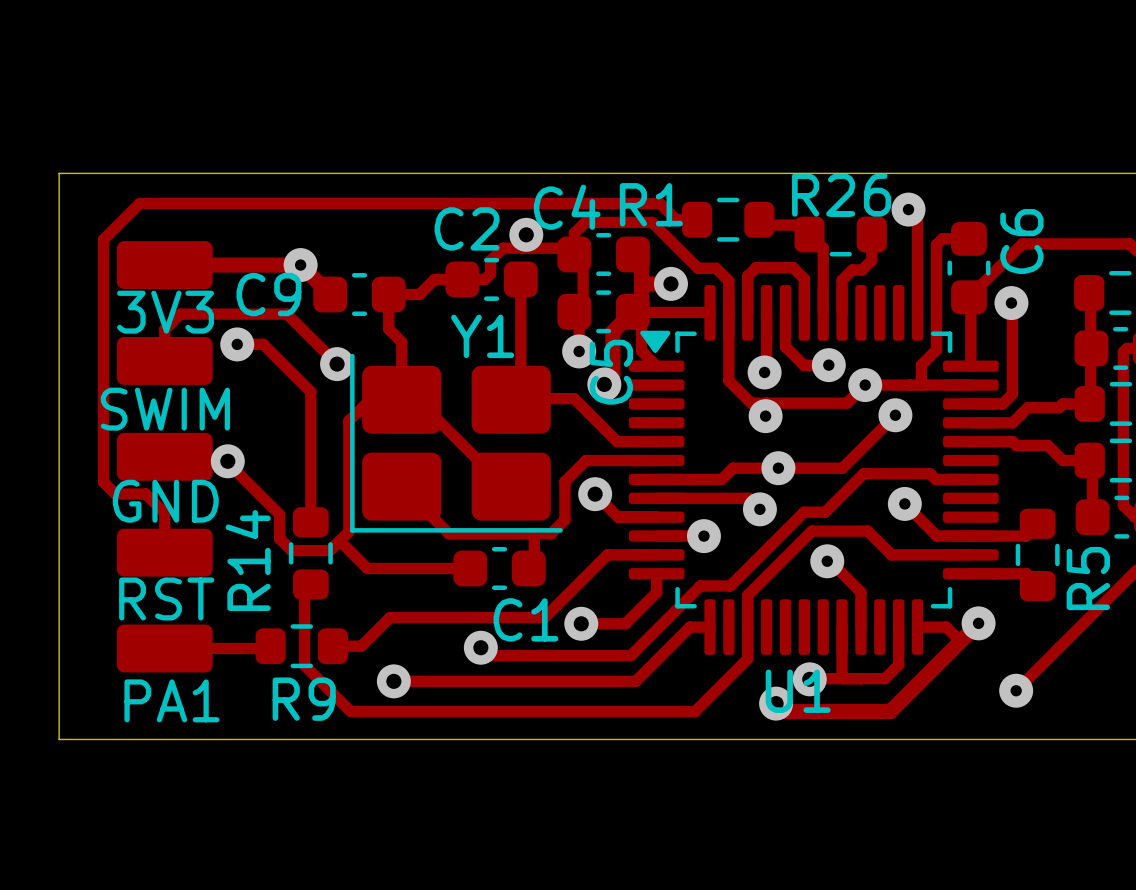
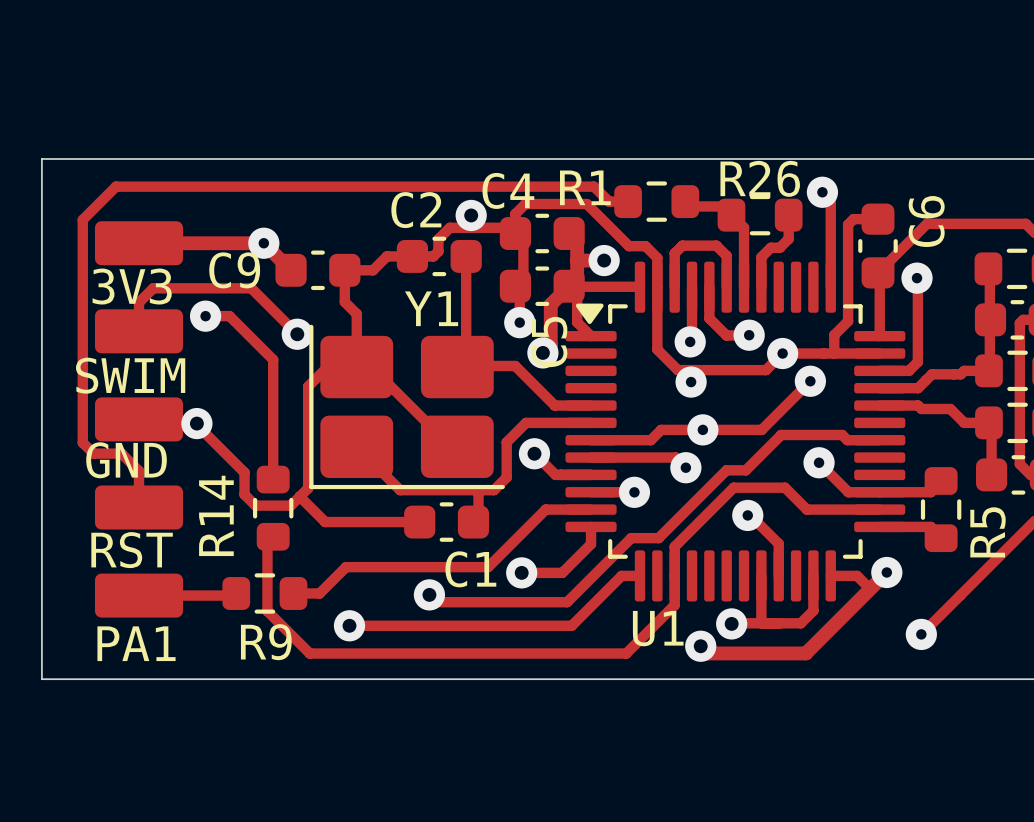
U1 name position: U1 (798, 691) -> U1 (658, 628)

